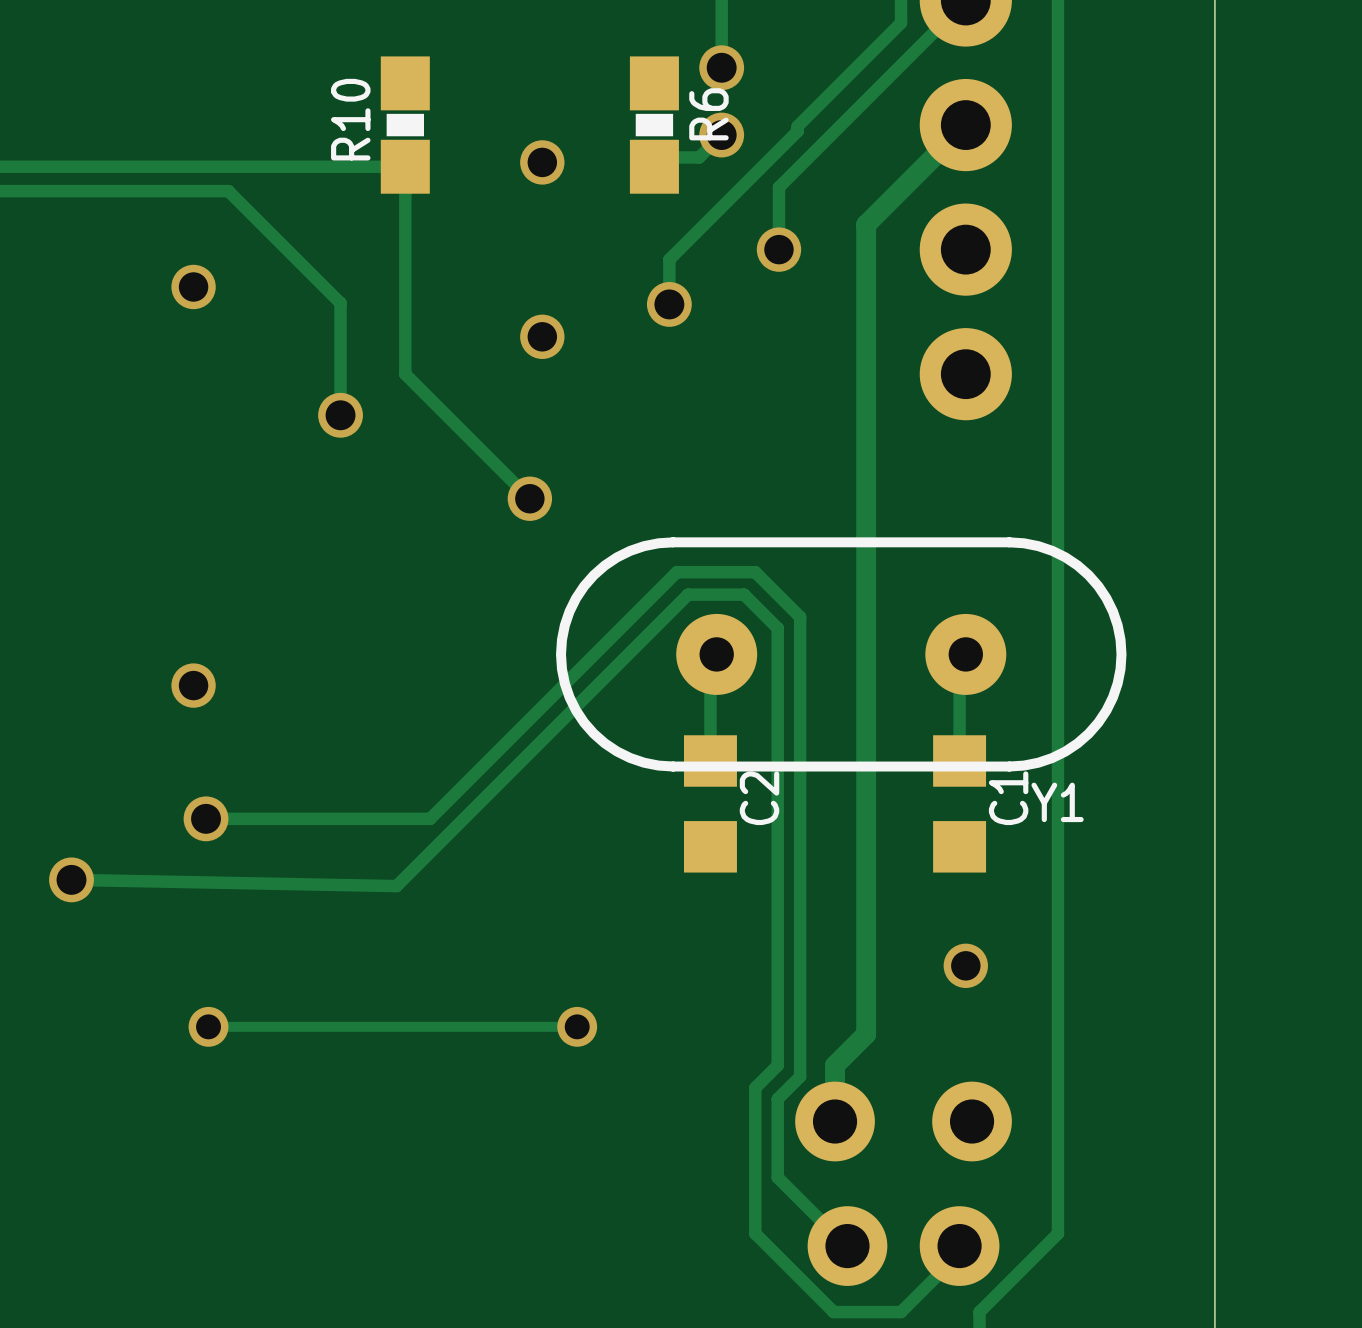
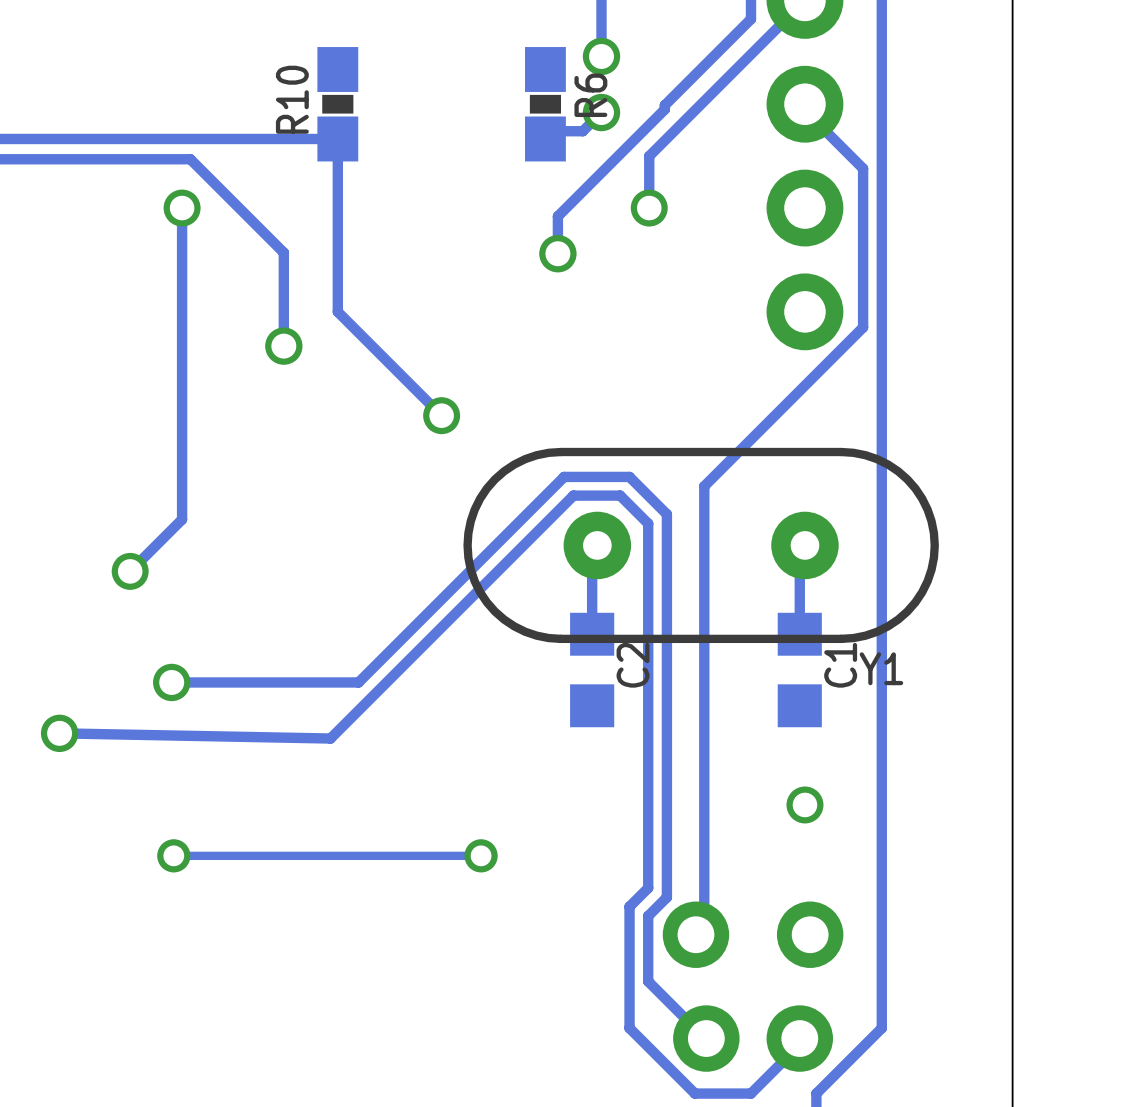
track: (965, 125) (866, 224) (866, 1034) (835, 1065) (835, 1121) -> (804, 104) (807, 112) (863, 168) (863, 327) (704, 486) (704, 934) (695, 934)
via: (542, 162) -> none
track: none -> (182, 208) (182, 519) (130, 571)
via position: (193, 286) -> (182, 208)
via: (542, 336) -> none
via position: (193, 685) -> (130, 571)

